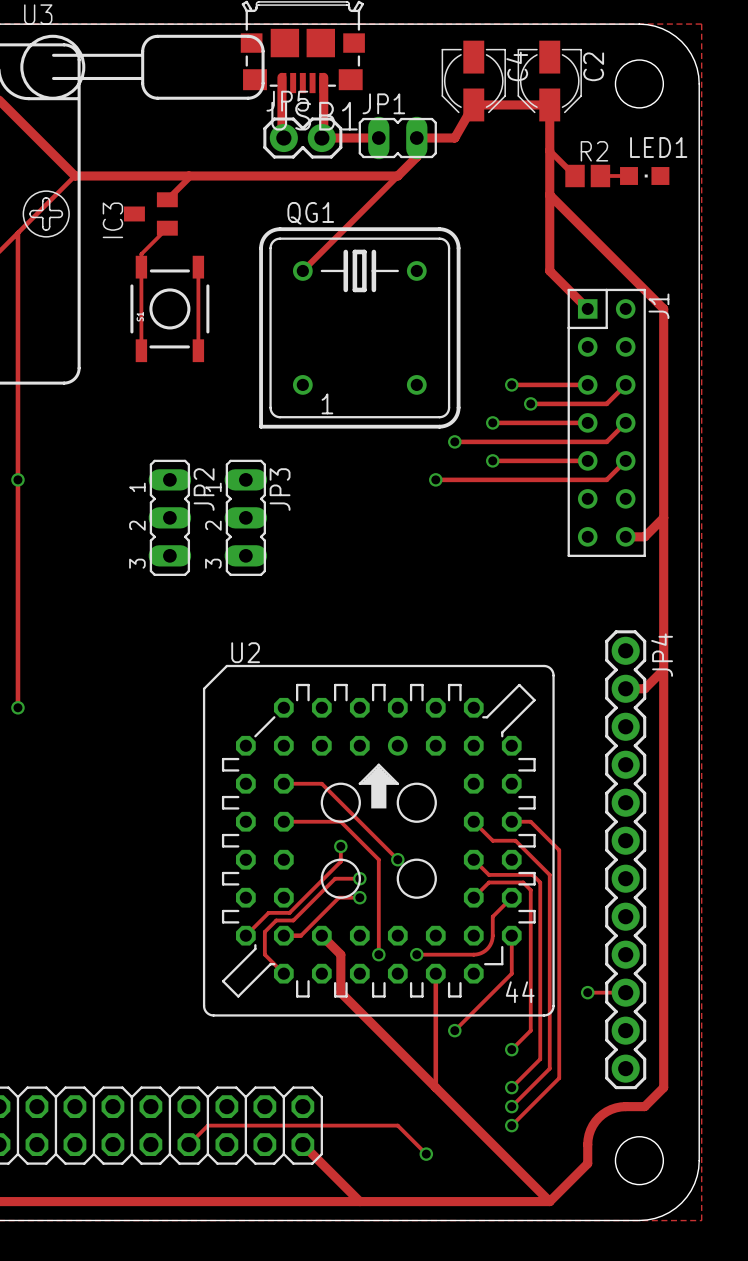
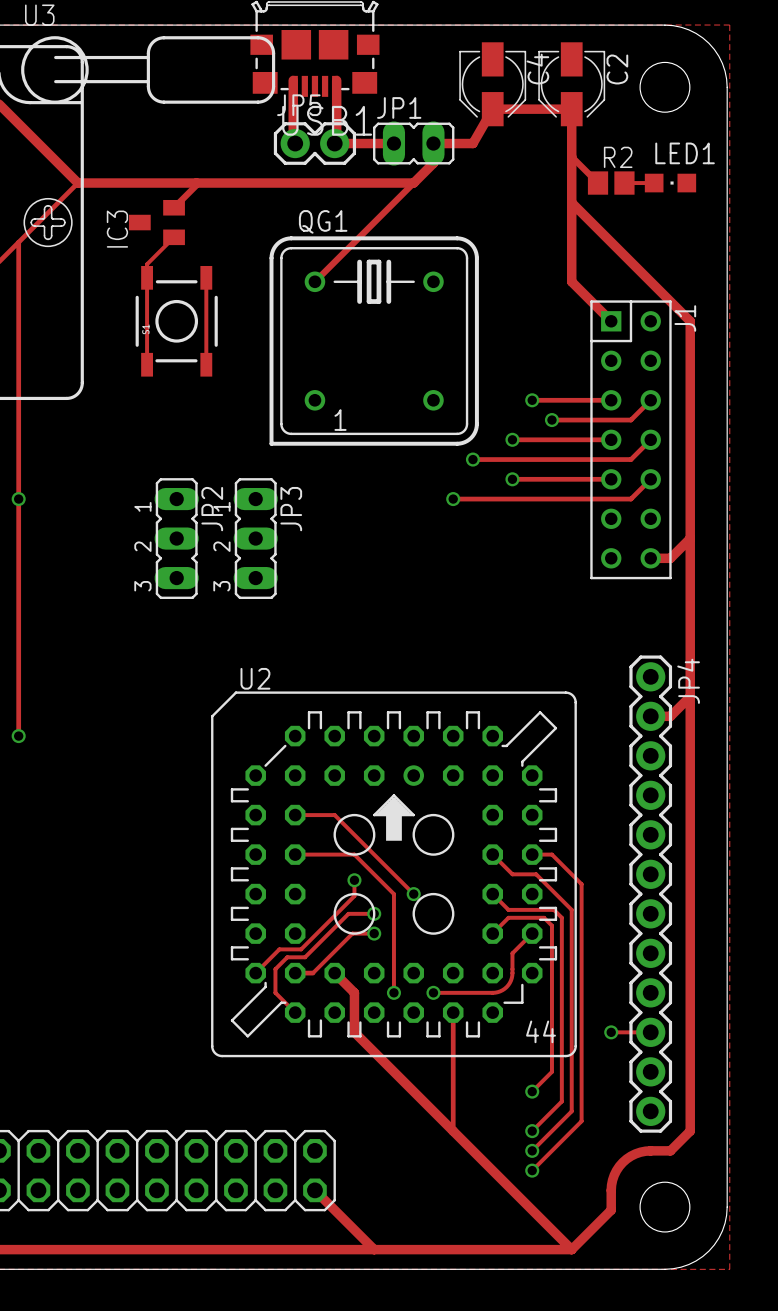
track: (511, 935) (511, 973) (454, 1030) -> none
via: (454, 1030) -> none
track: (188, 1144) (207, 1125) (397, 1125) (426, 1154) -> none
via: (426, 1154) -> none

